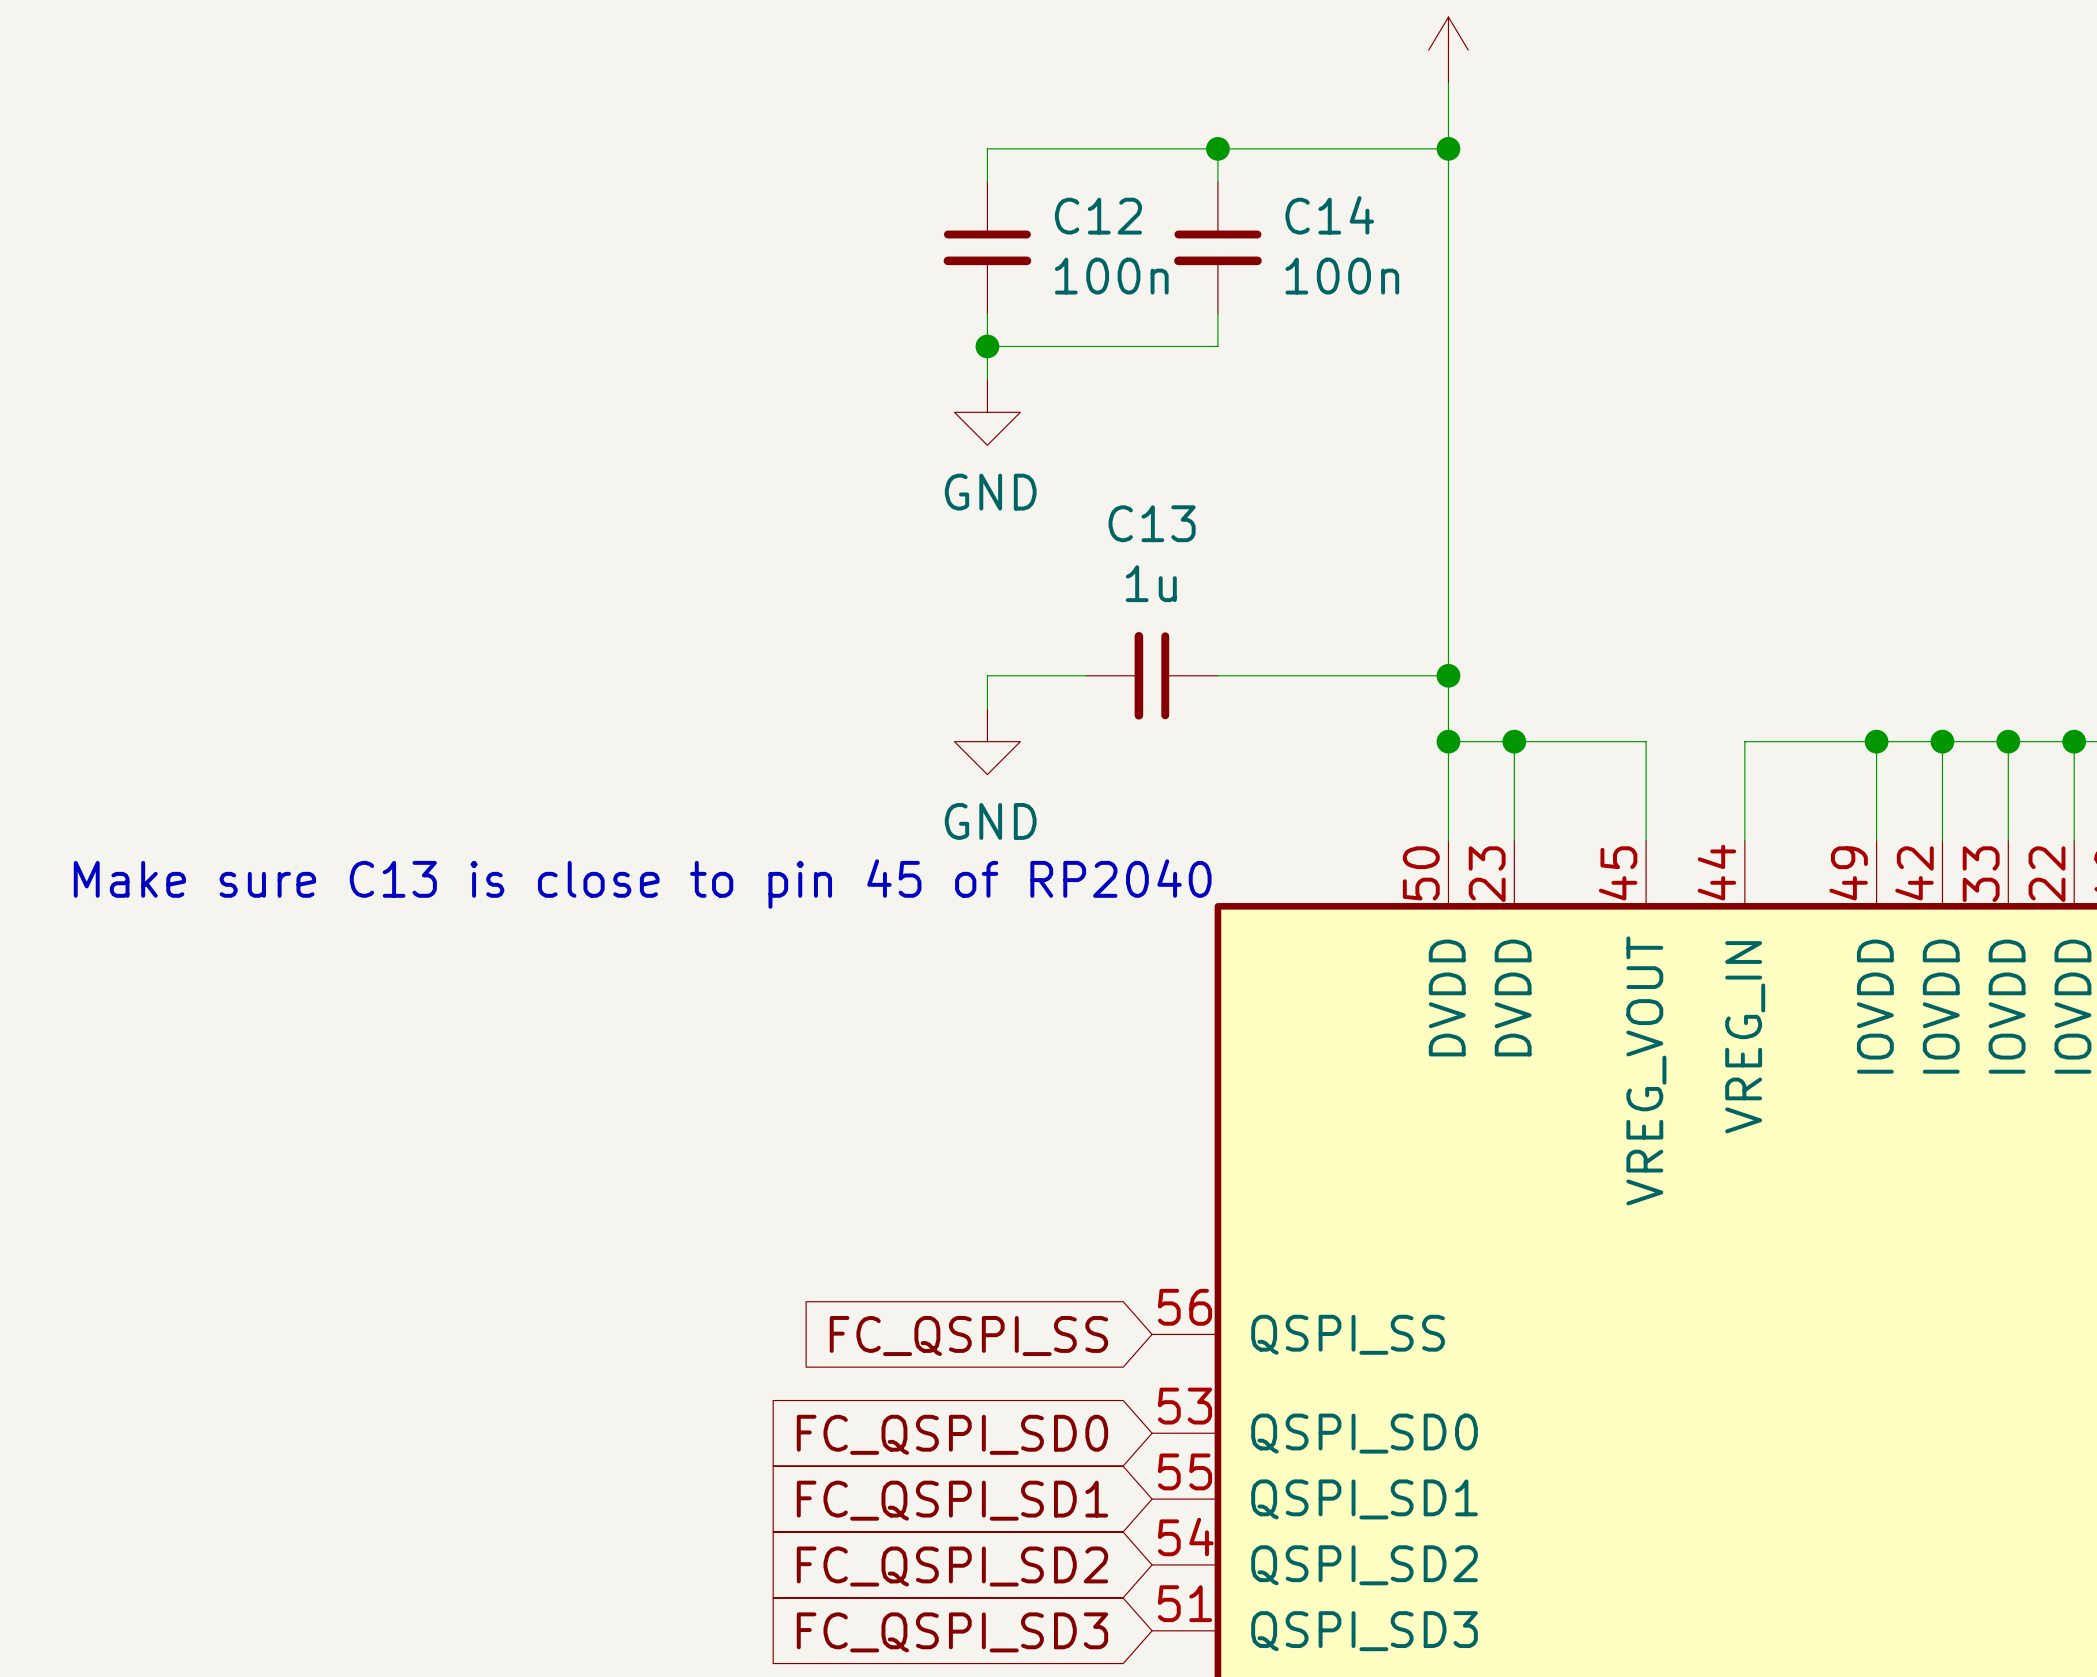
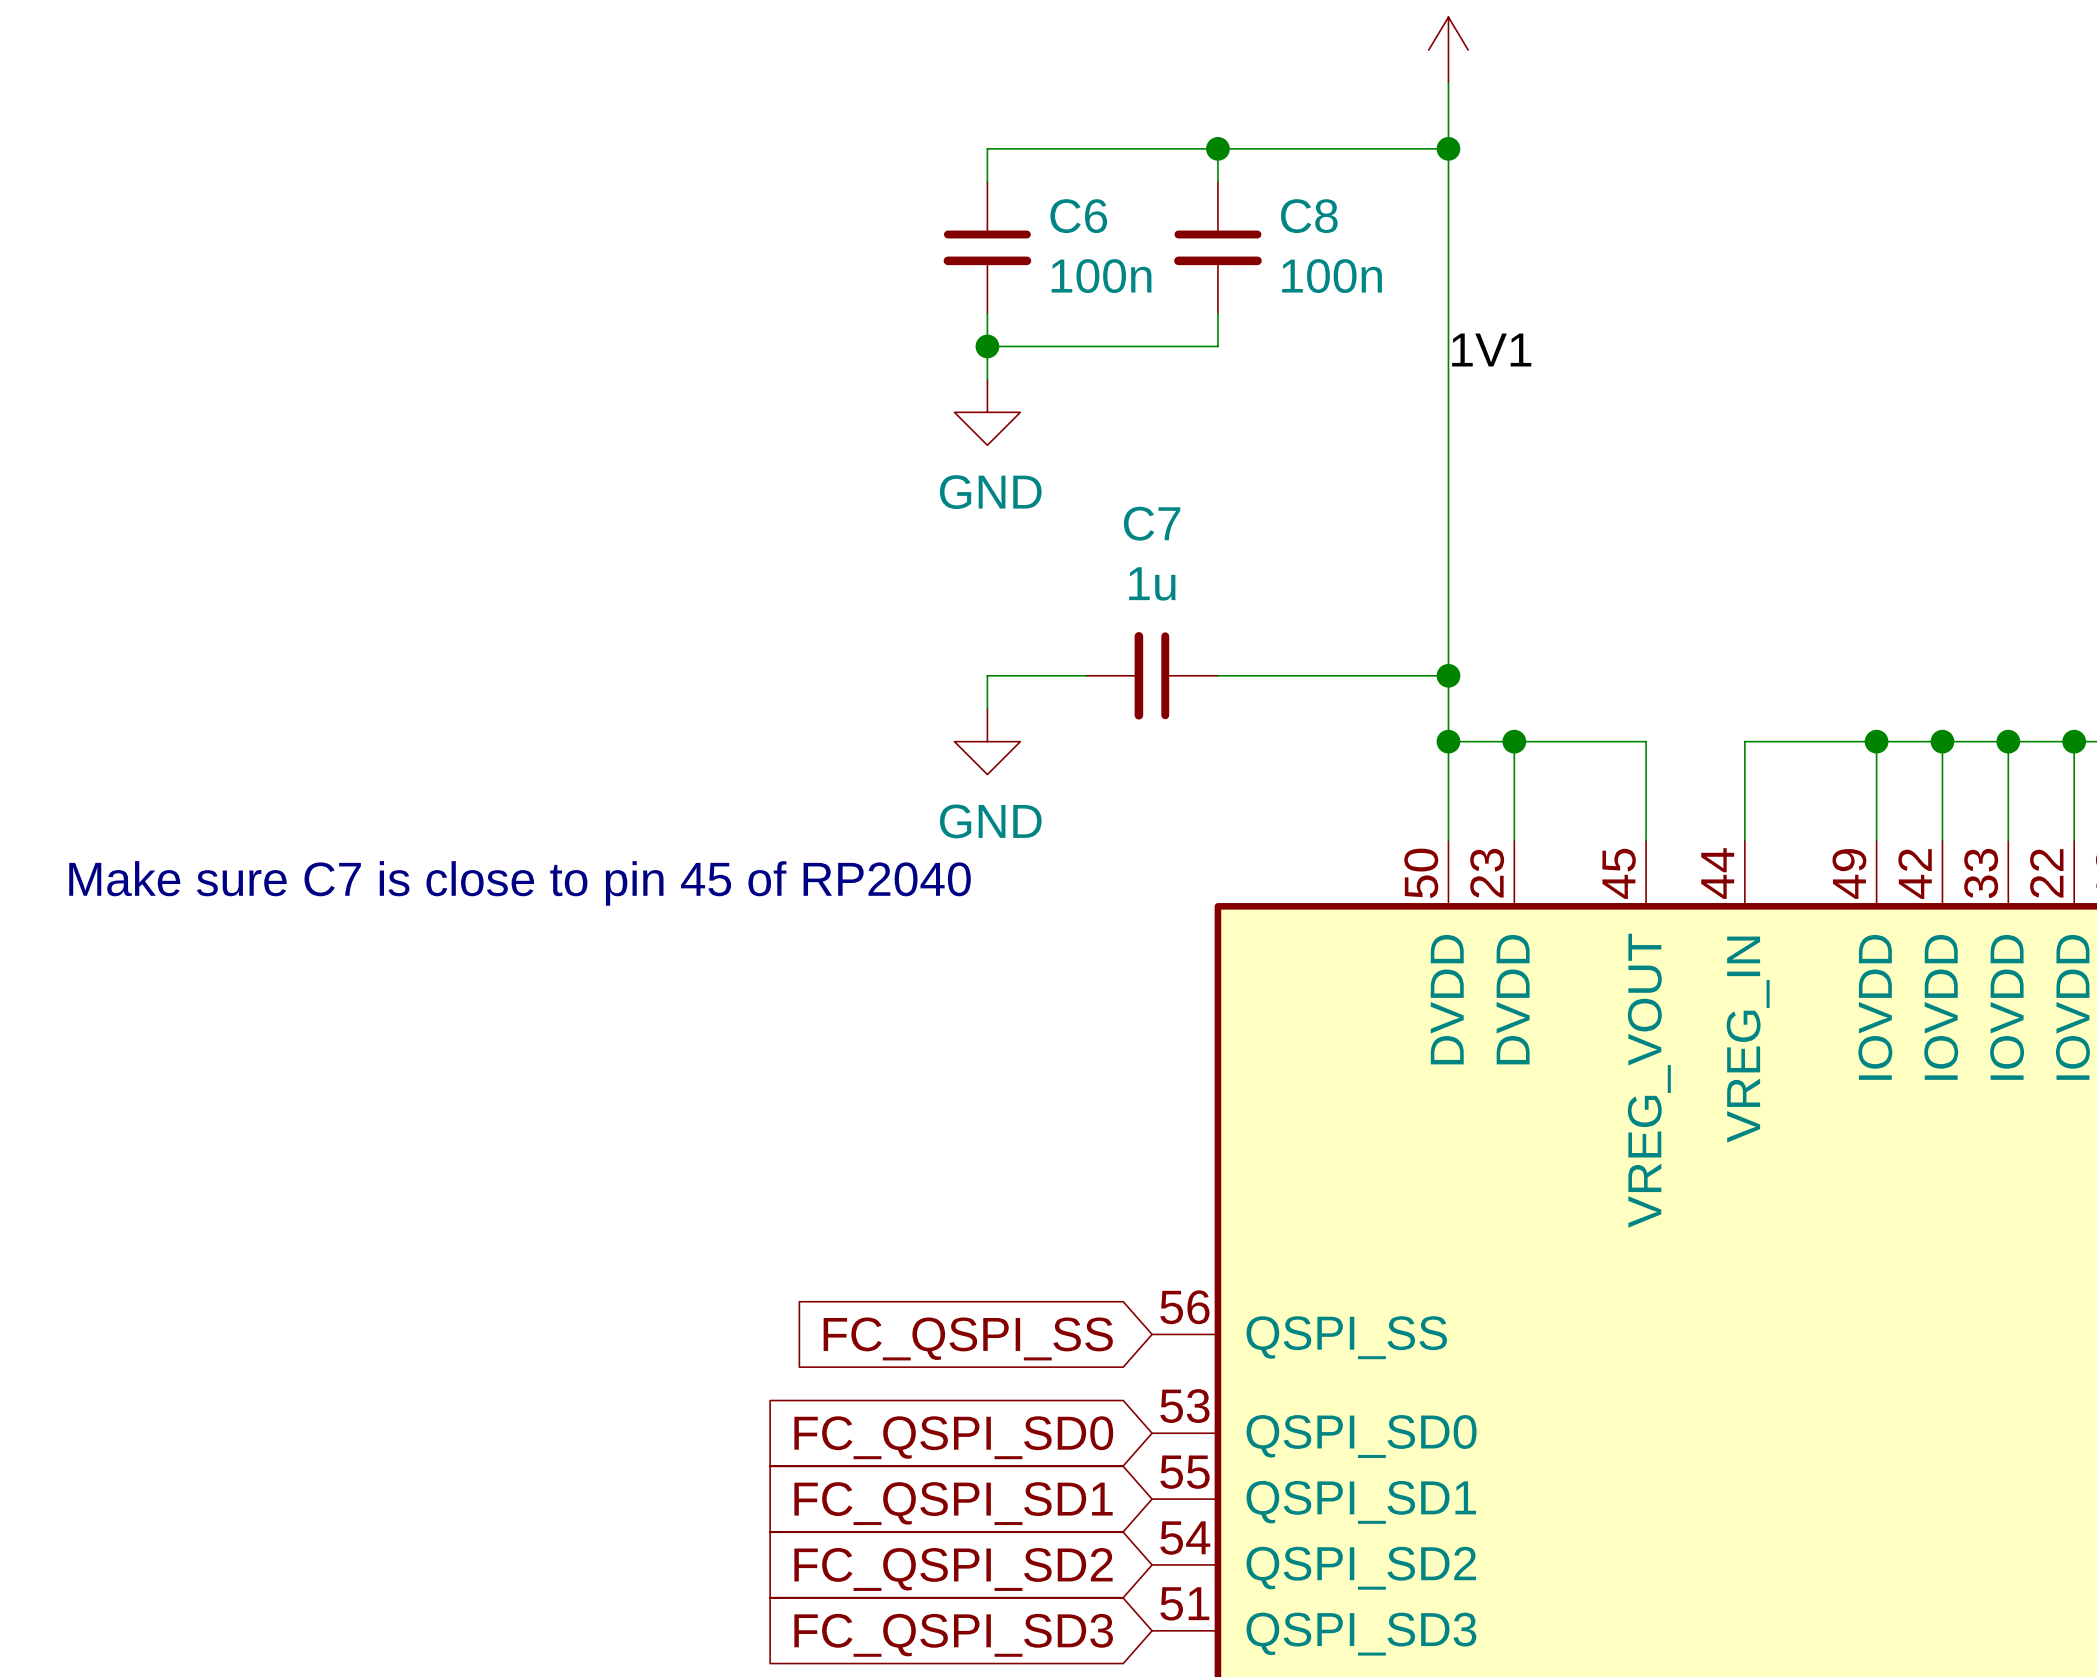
C14 name: C14 (1329, 215) -> C8 (1309, 216)
C12 name: C12 (1098, 216) -> C6 (1078, 216)
label: none -> 1V1 (1491, 350)
C13 name: C13 (1152, 523) -> C7 (1152, 523)
text: Make sure C13 is close to pin 45 of RP2040 (642, 884) -> Make sure C7 is close to pin 45 of RP2040 (520, 883)

